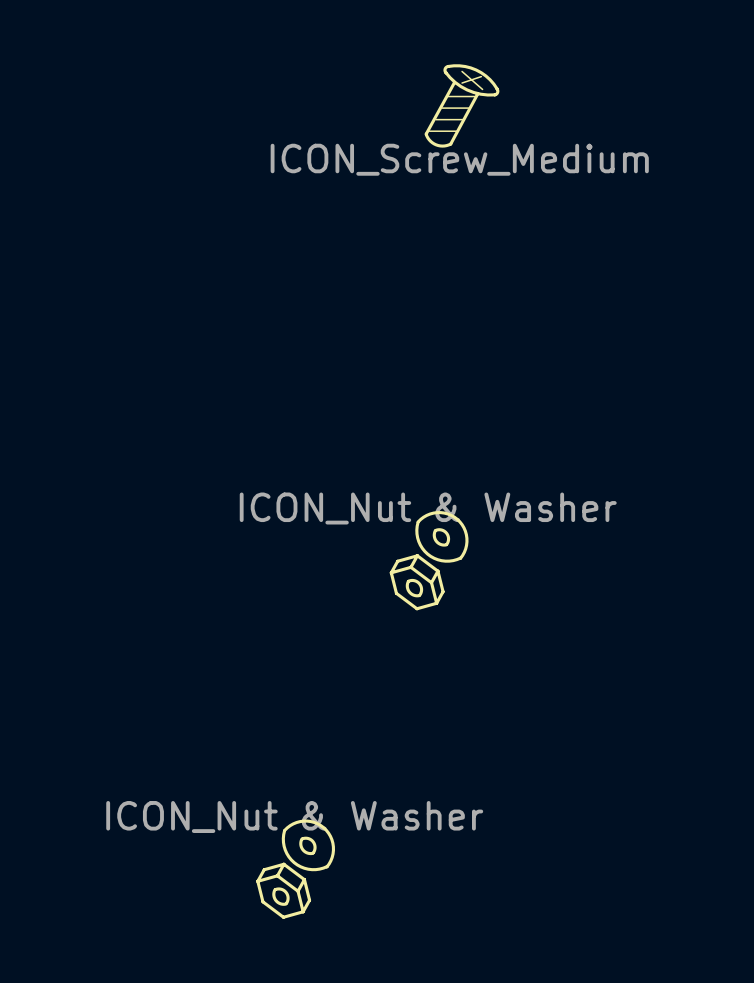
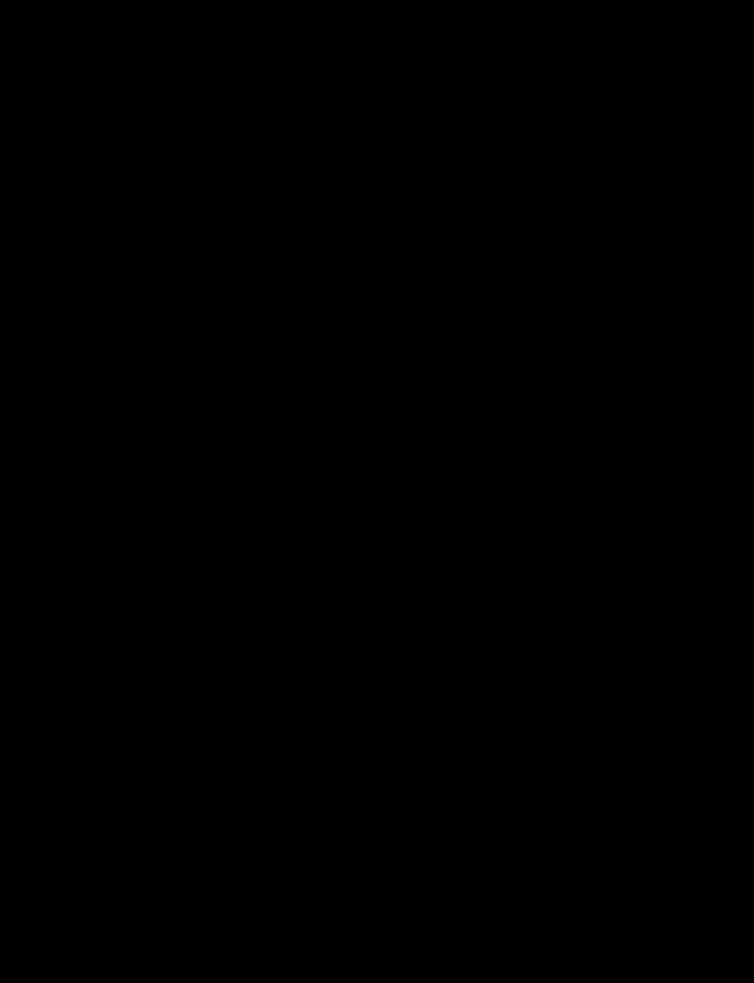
drawing: [424, 64, 500, 148] -> none
drawing: [389, 511, 469, 611] -> none
drawing: [256, 819, 336, 919] -> none

